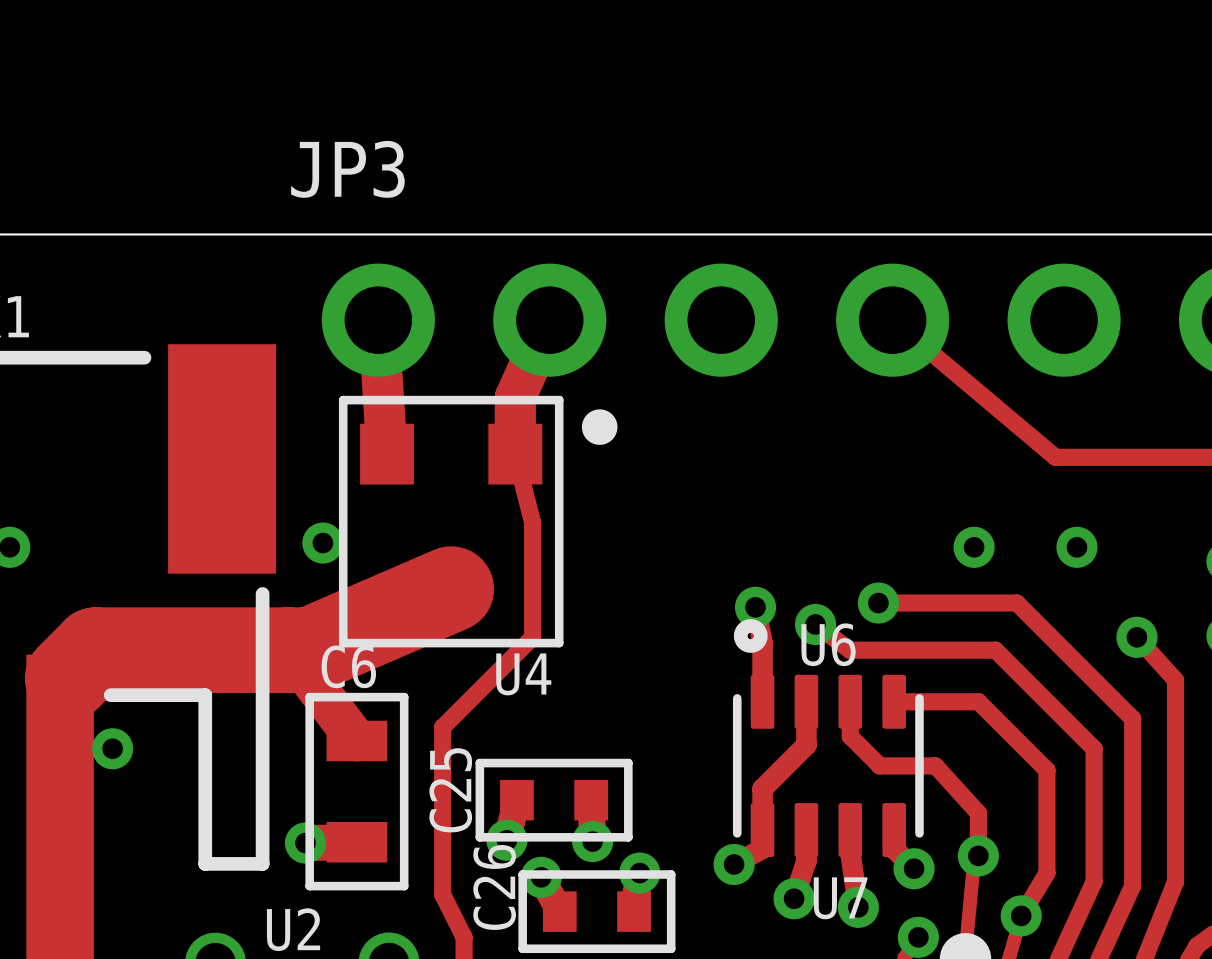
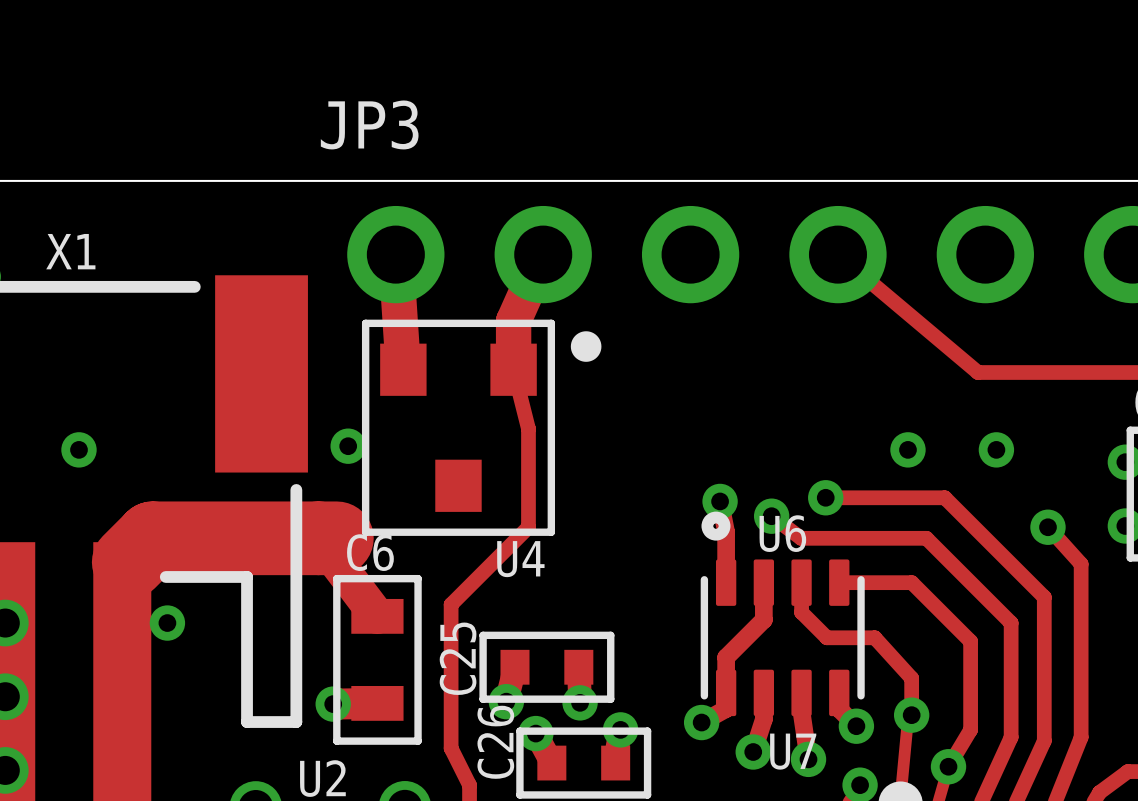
track: (451, 589) (309, 650) -> none

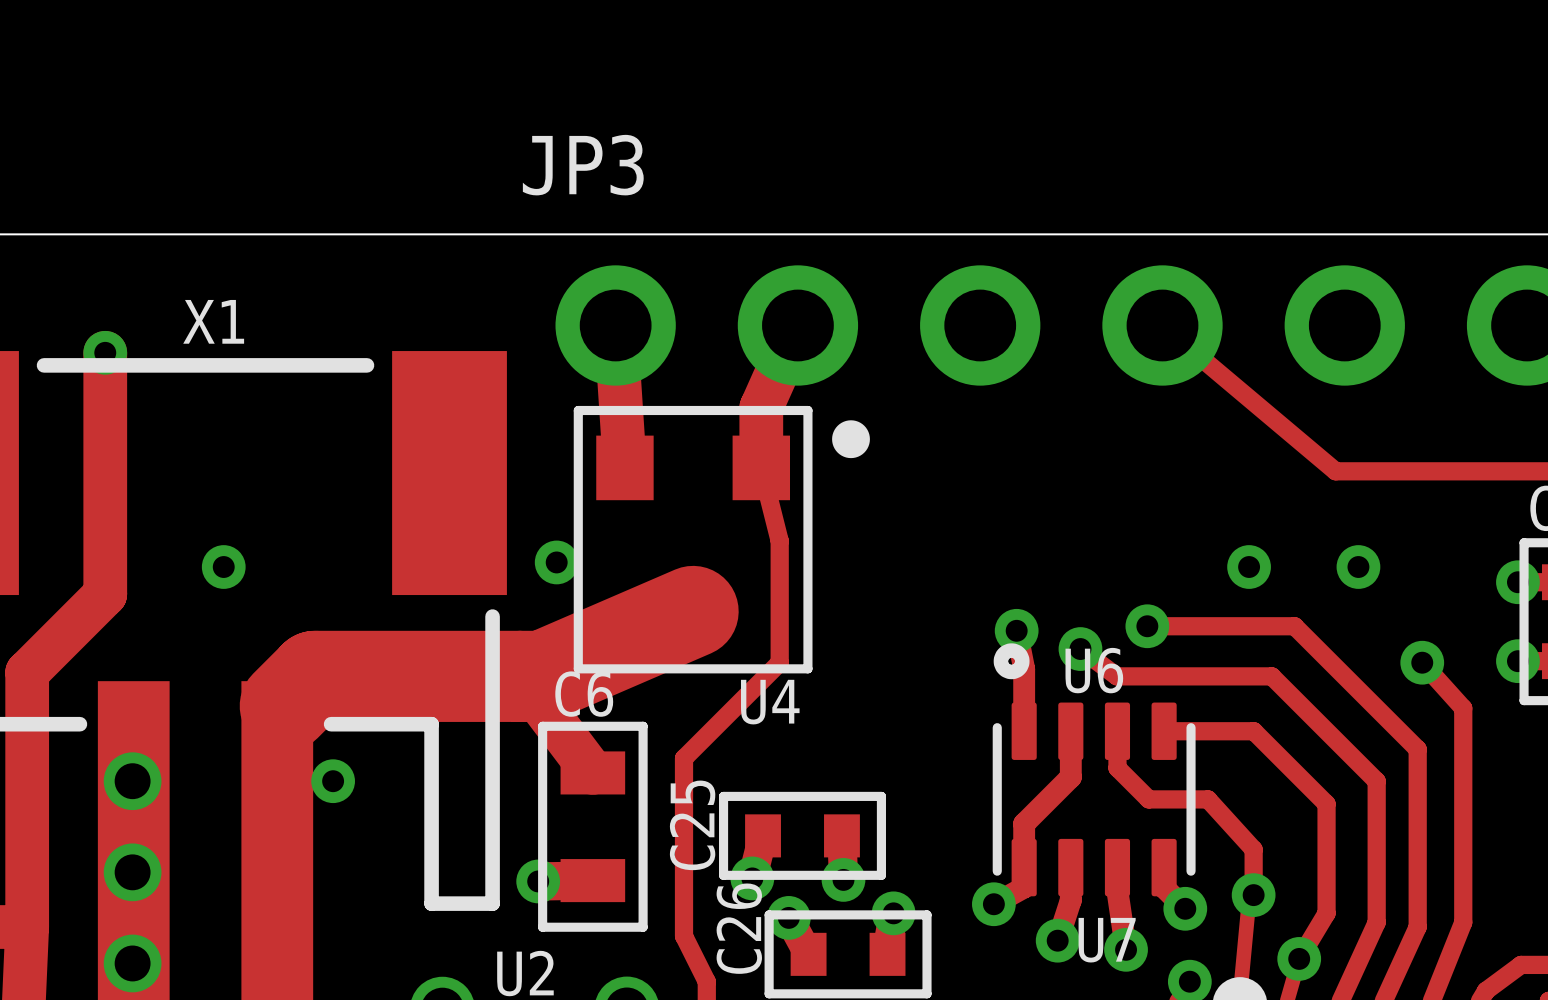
track: none -> (693, 611) (542, 676)

